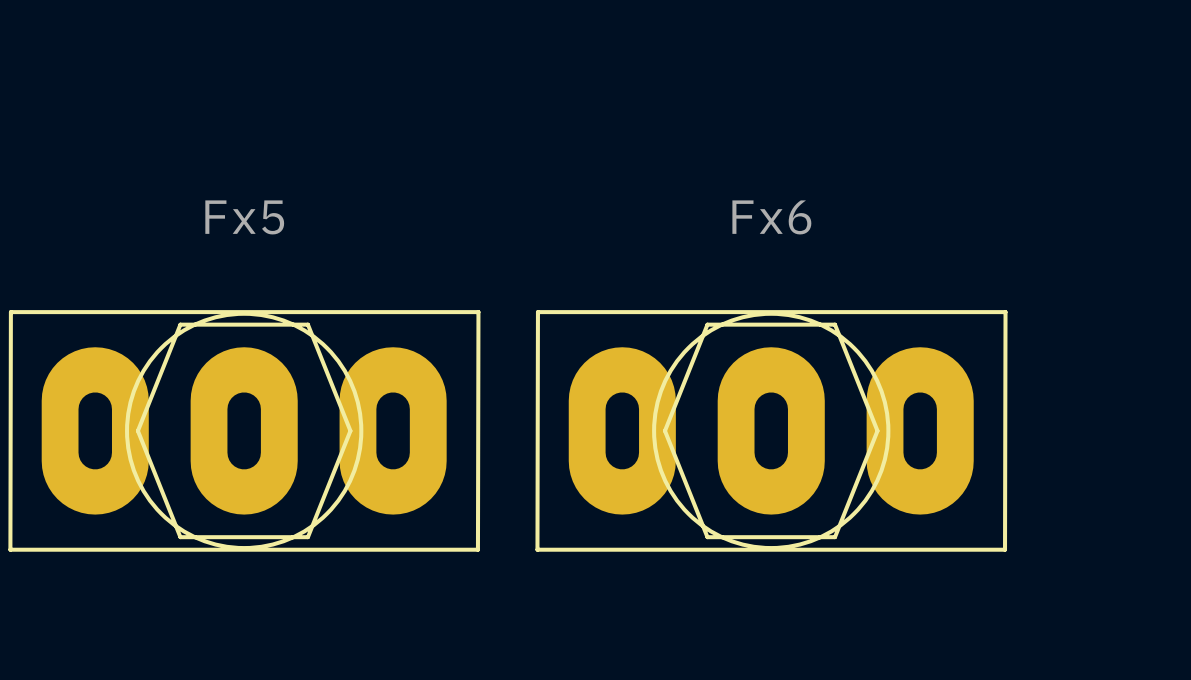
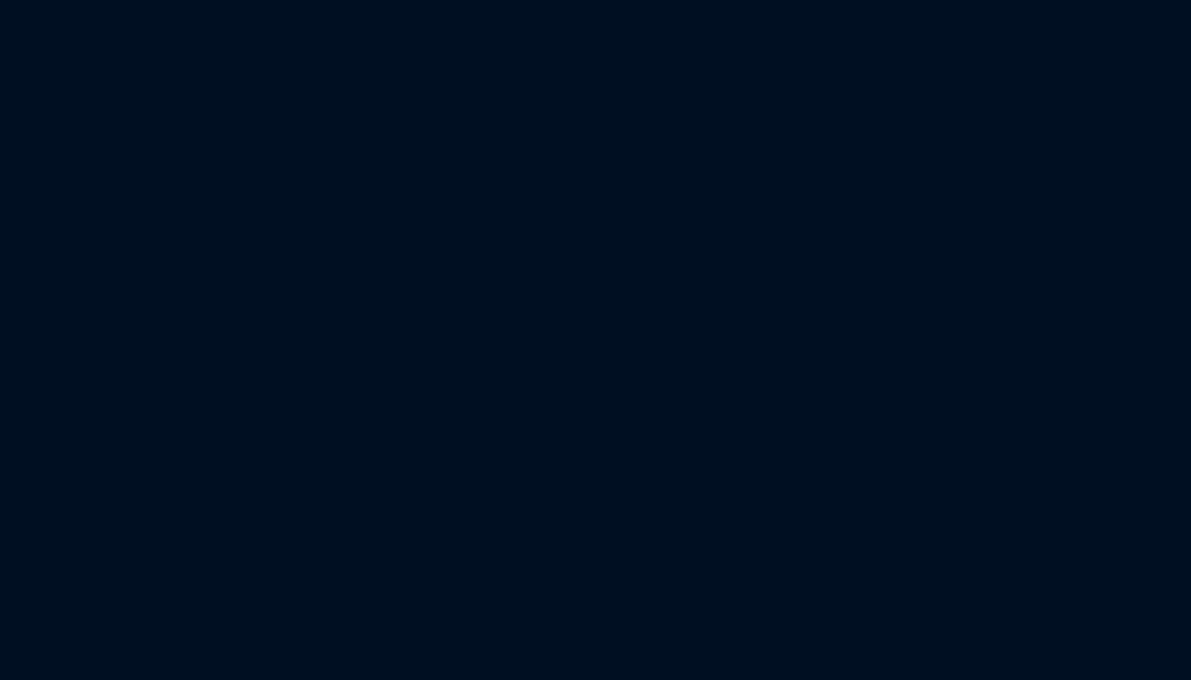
part: Fx5 (244, 430) -> none
part: Fx6 (771, 430) -> none

